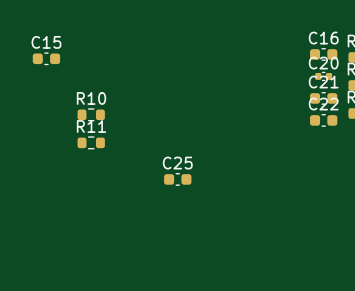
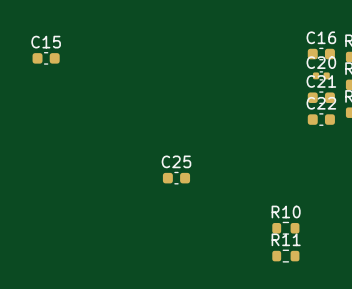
R10 position: (91, 114) -> (285, 228)
R11 position: (91, 142) -> (285, 256)

